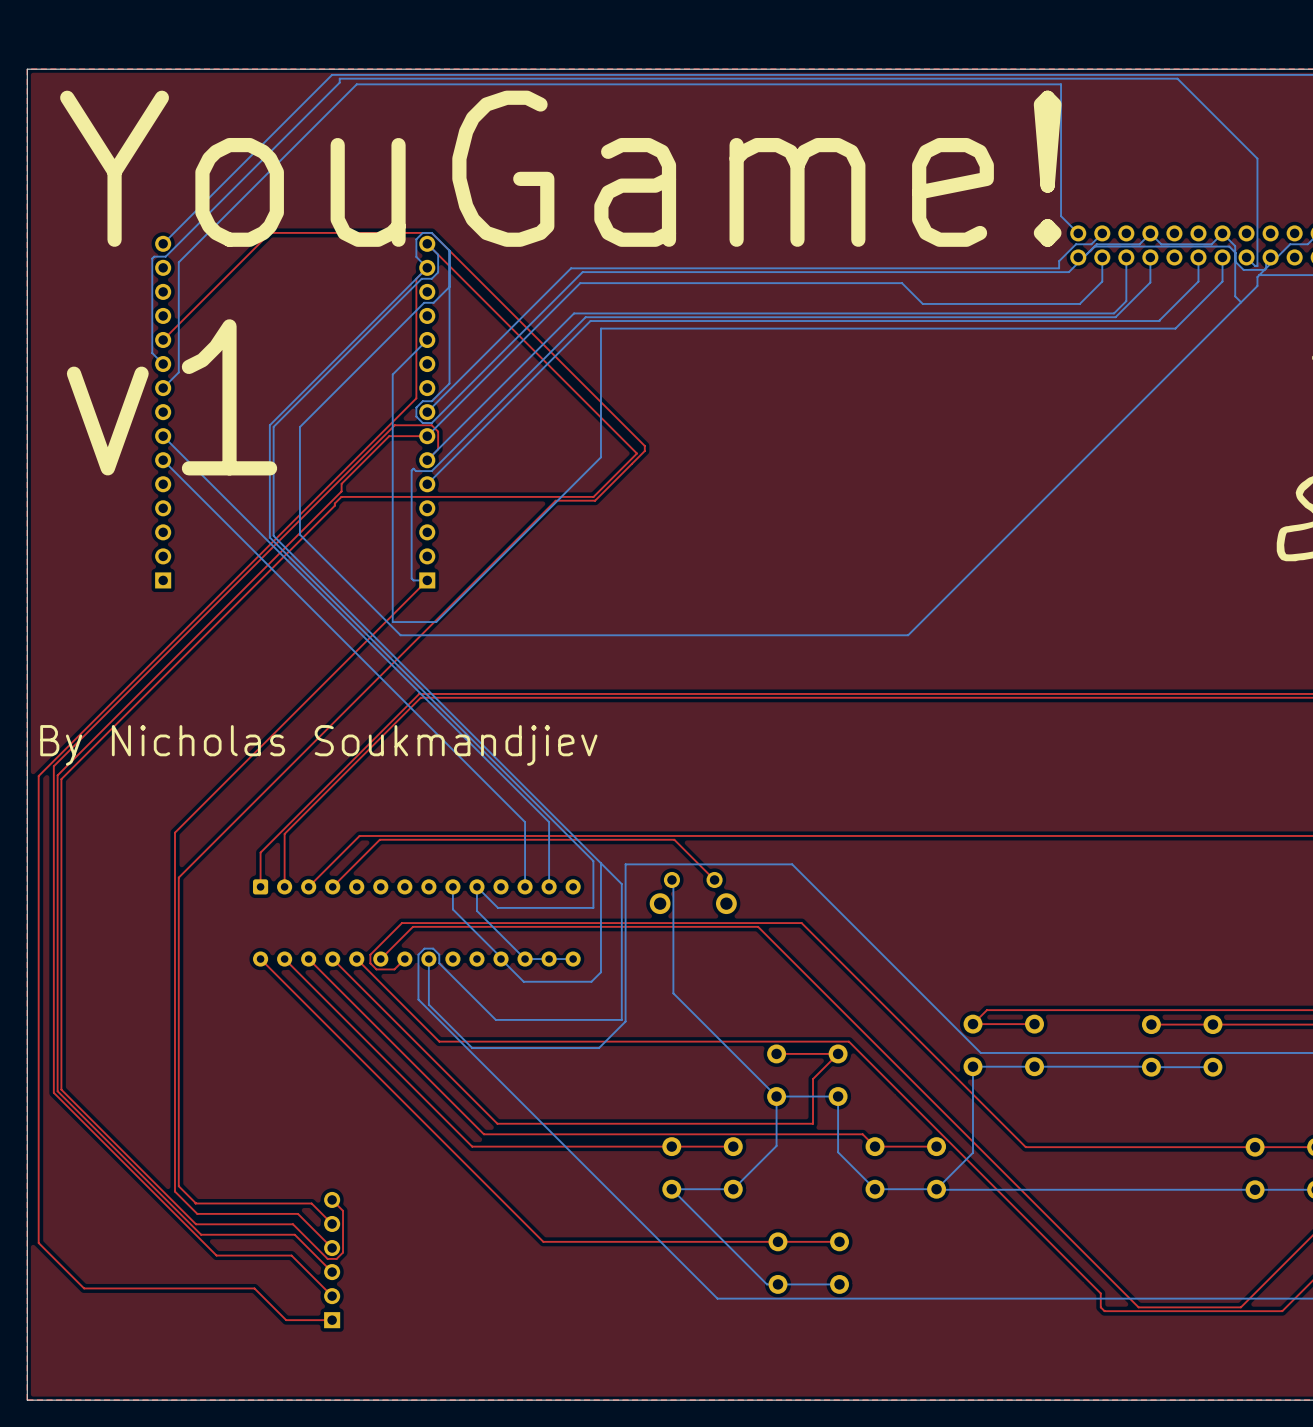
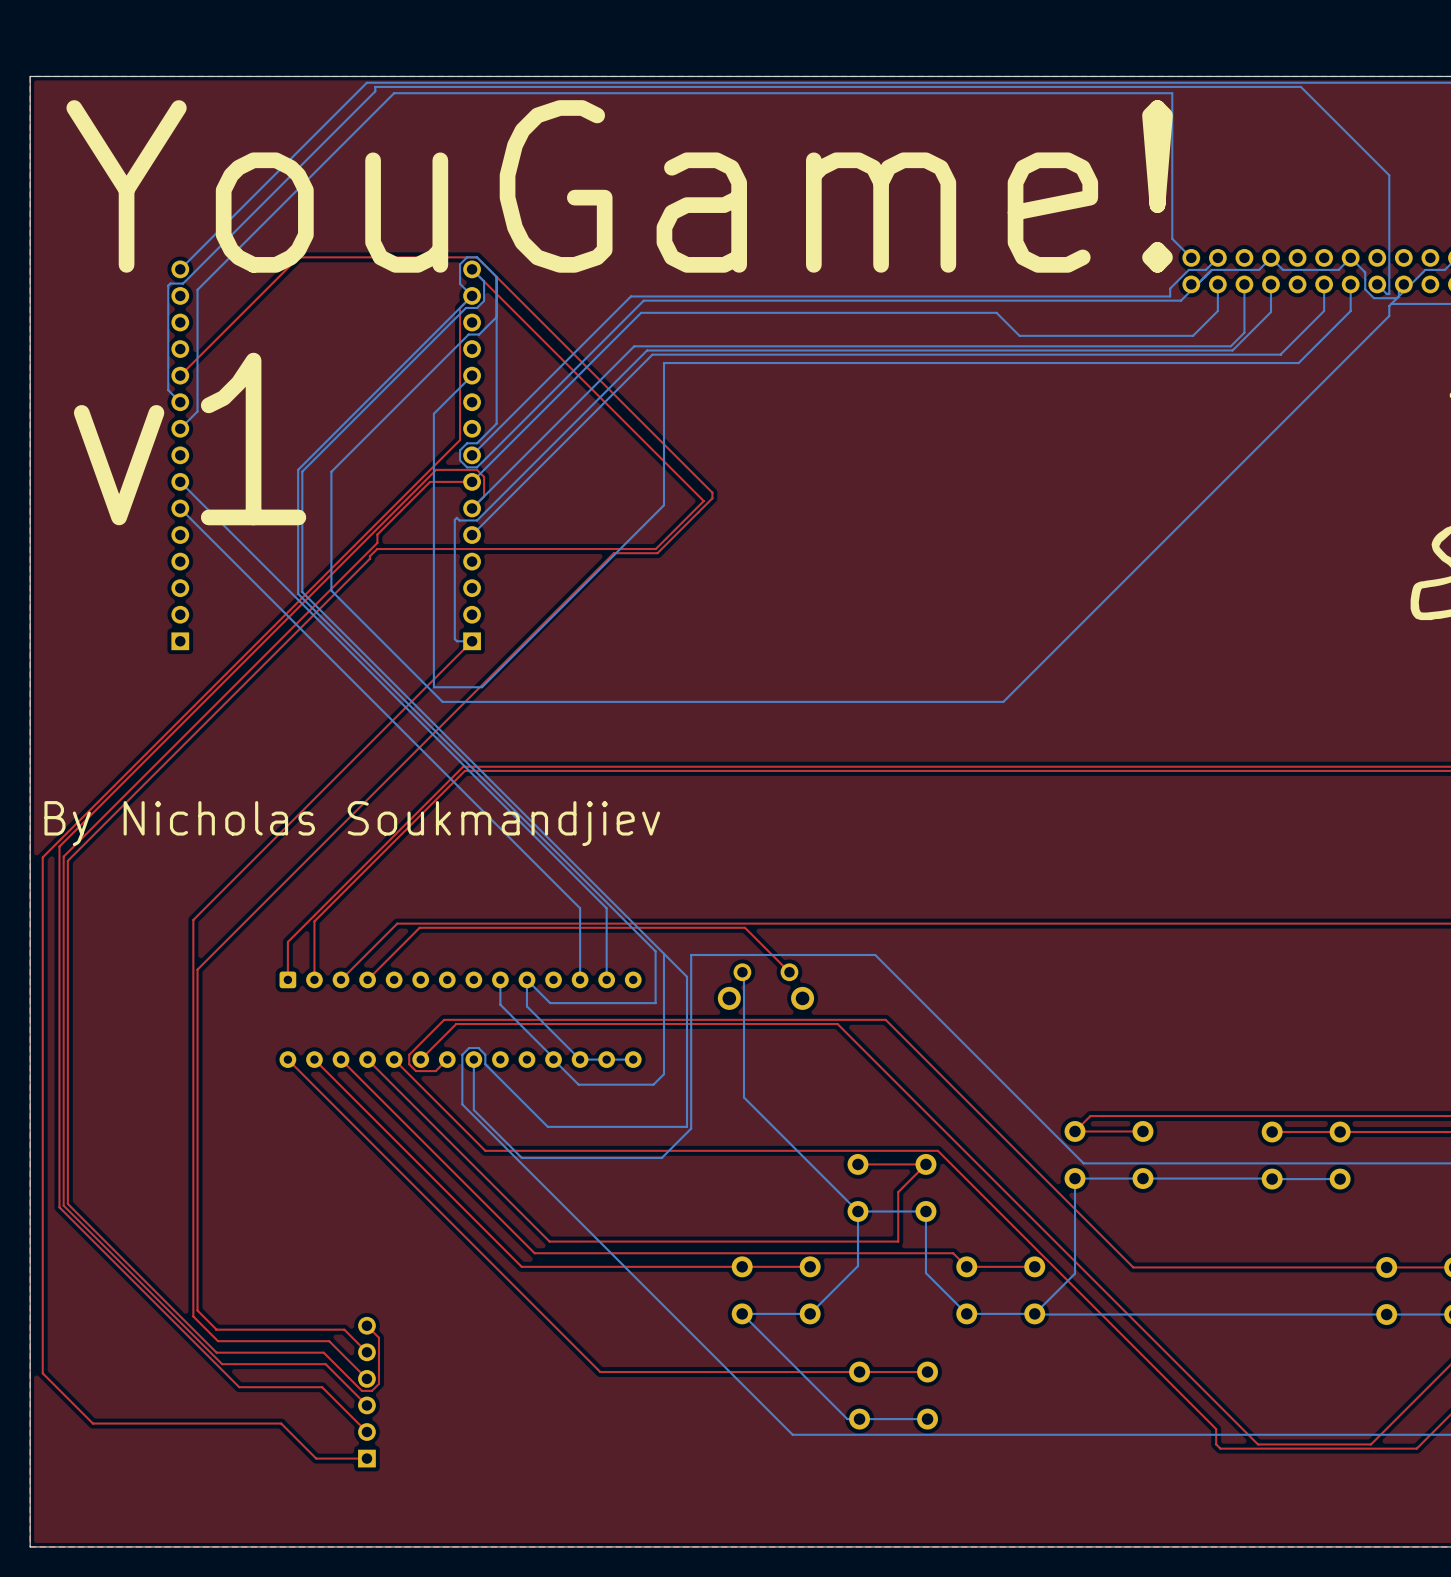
bottom track: (1094, 246) (1229, 246) (1235, 252) -> none
bottom track: (1235, 246) (1235, 296) (1241, 302) -> (1364, 272) (1365, 279)

